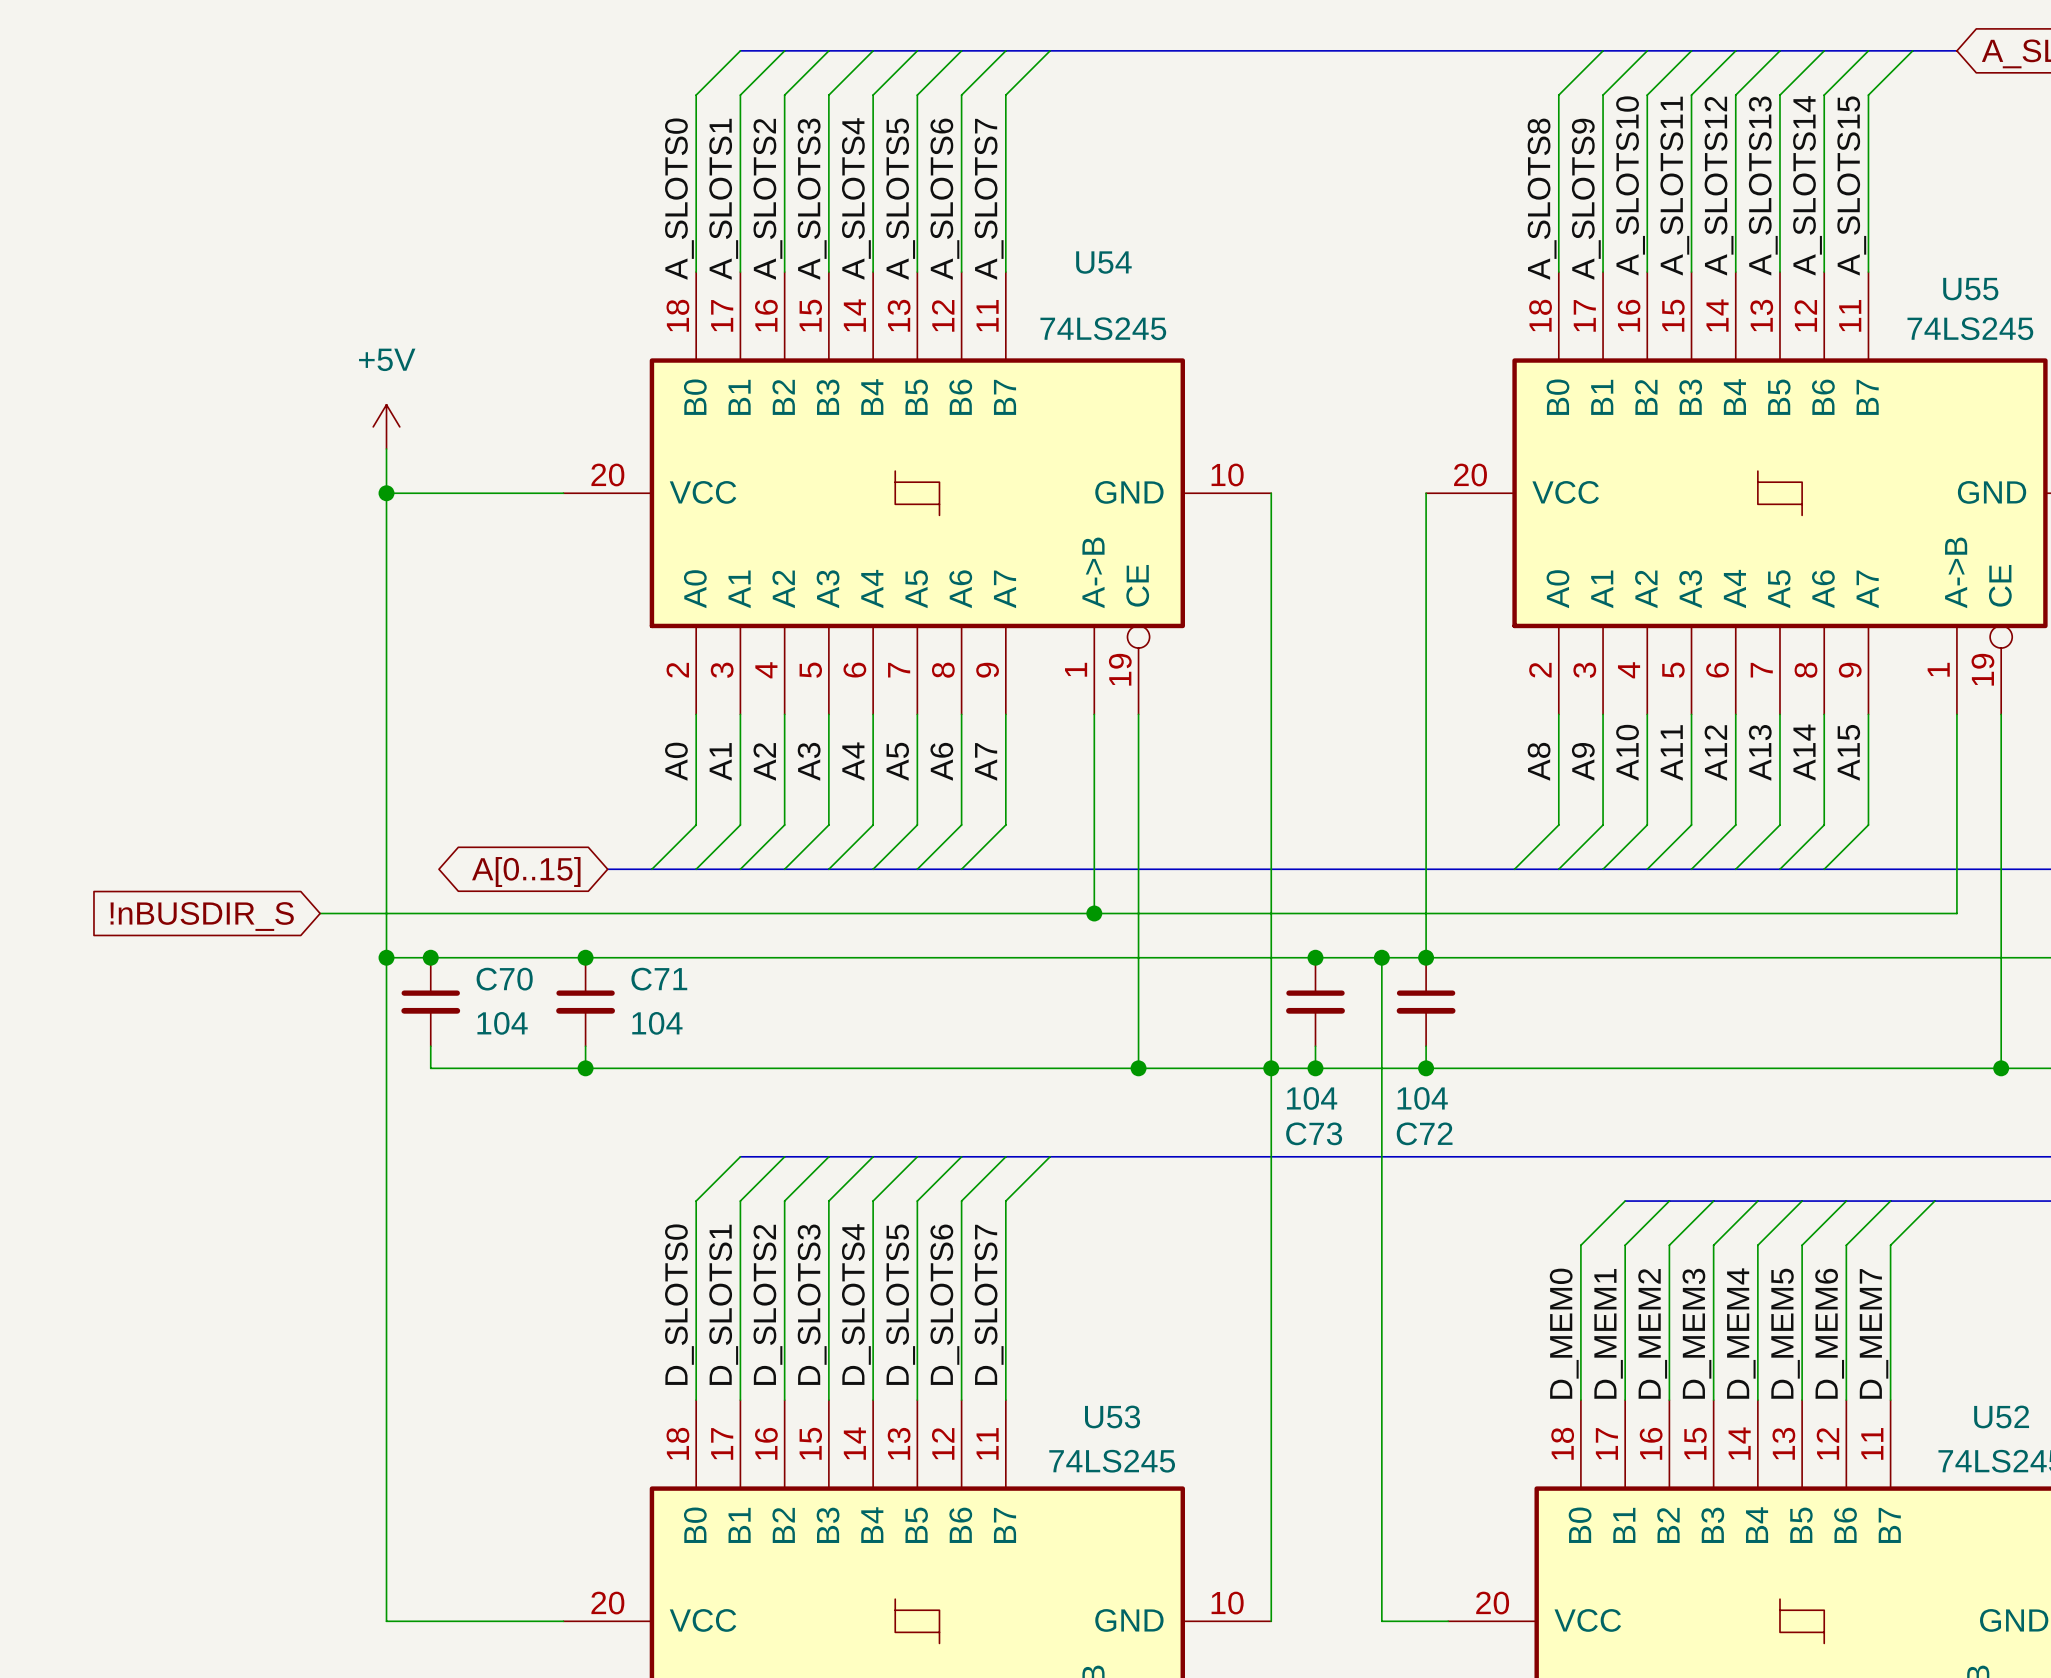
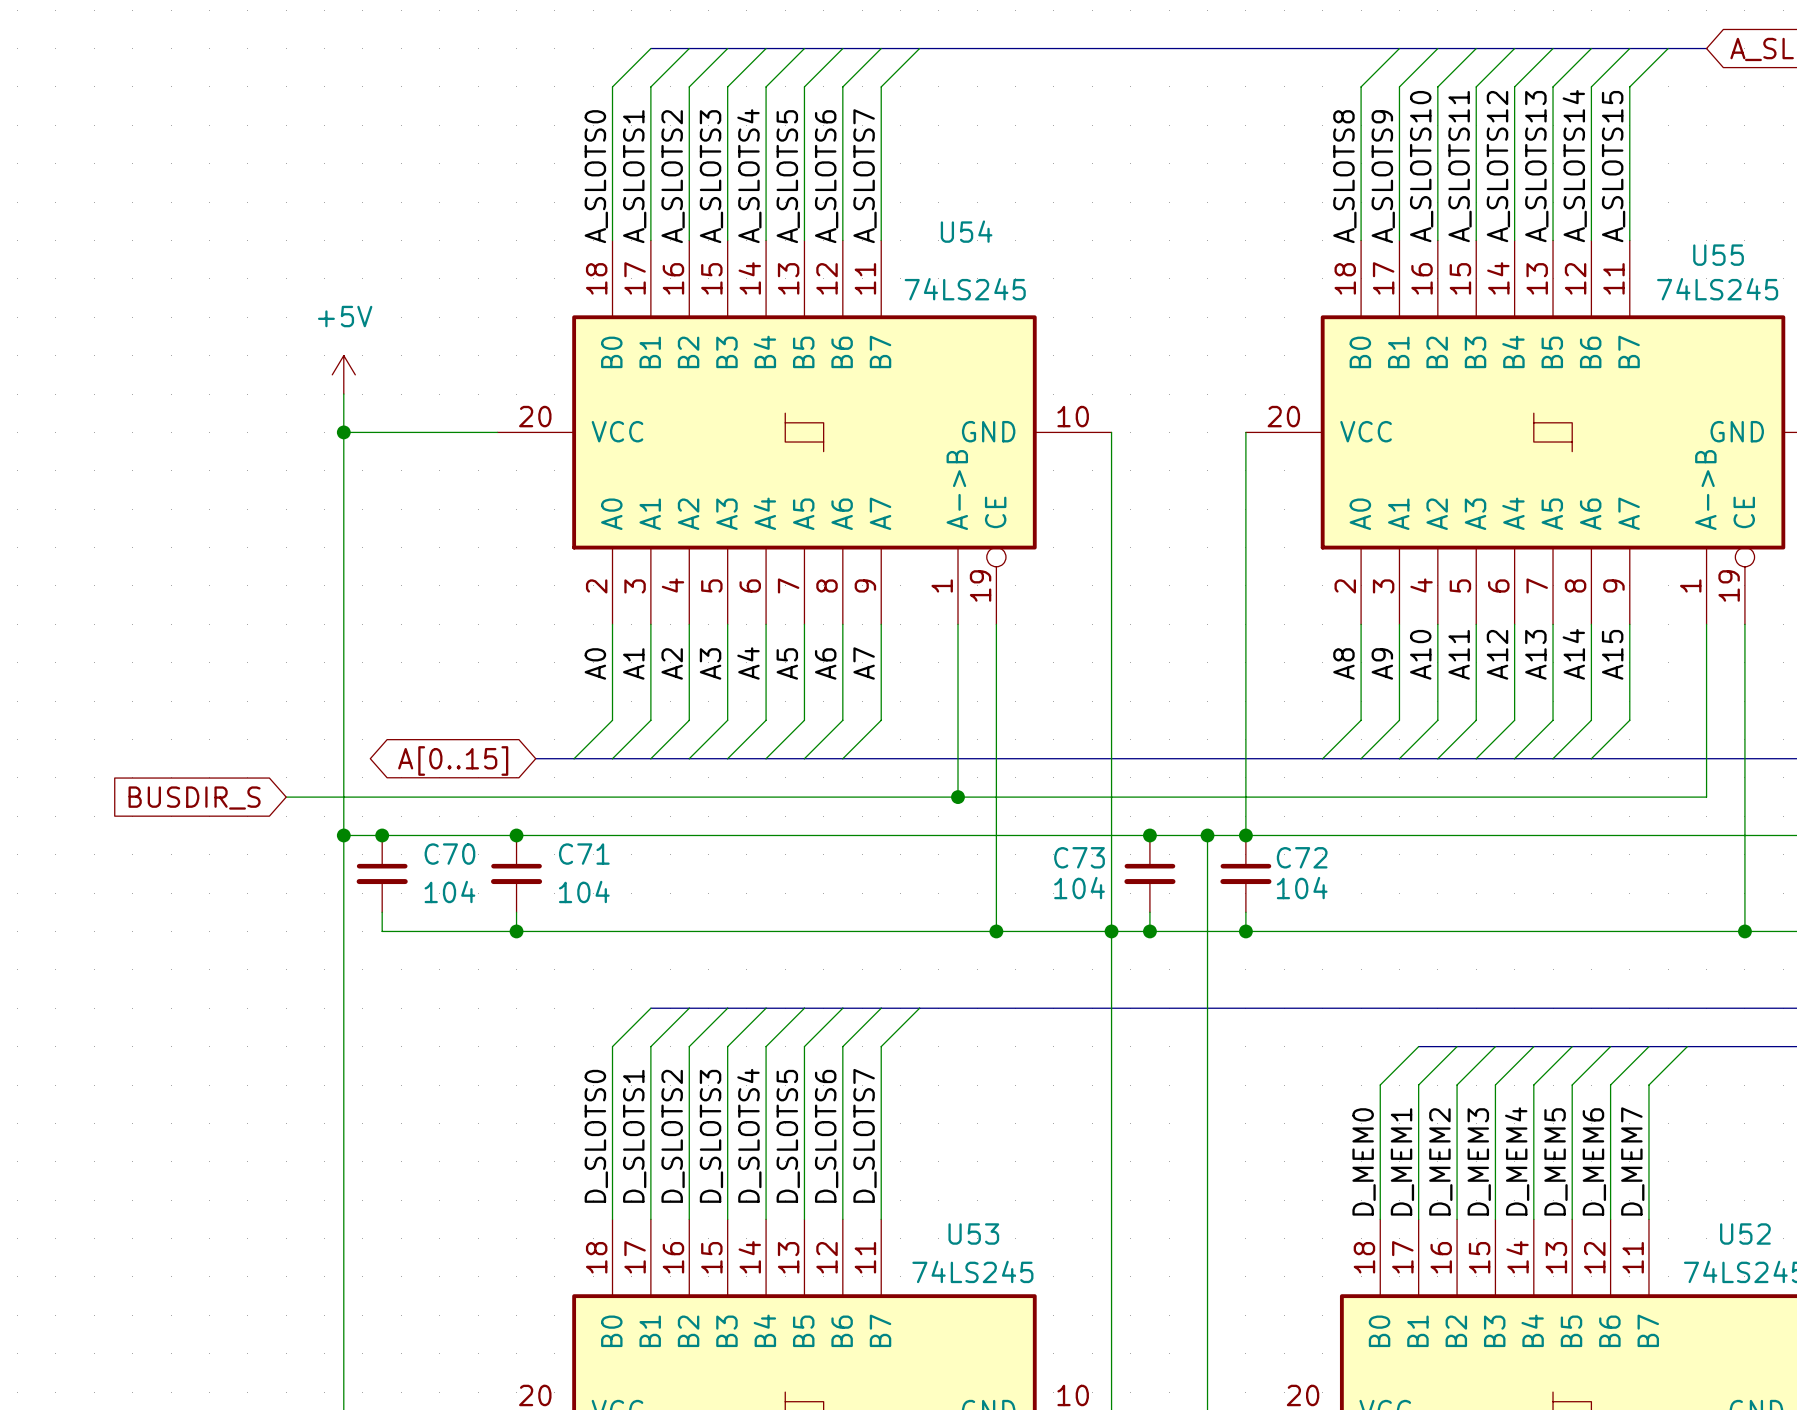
global label: !nBUSDIR_S (202, 916) -> BUSDIR_S (194, 798)
C73 value position: 104 (1312, 1098) -> 104 (1079, 888)
C72 value position: 104 (1422, 1098) -> 104 (1302, 888)
C73 name position: C73 (1314, 1133) -> C73 (1079, 857)
C72 name position: C72 (1424, 1133) -> C72 (1302, 857)

